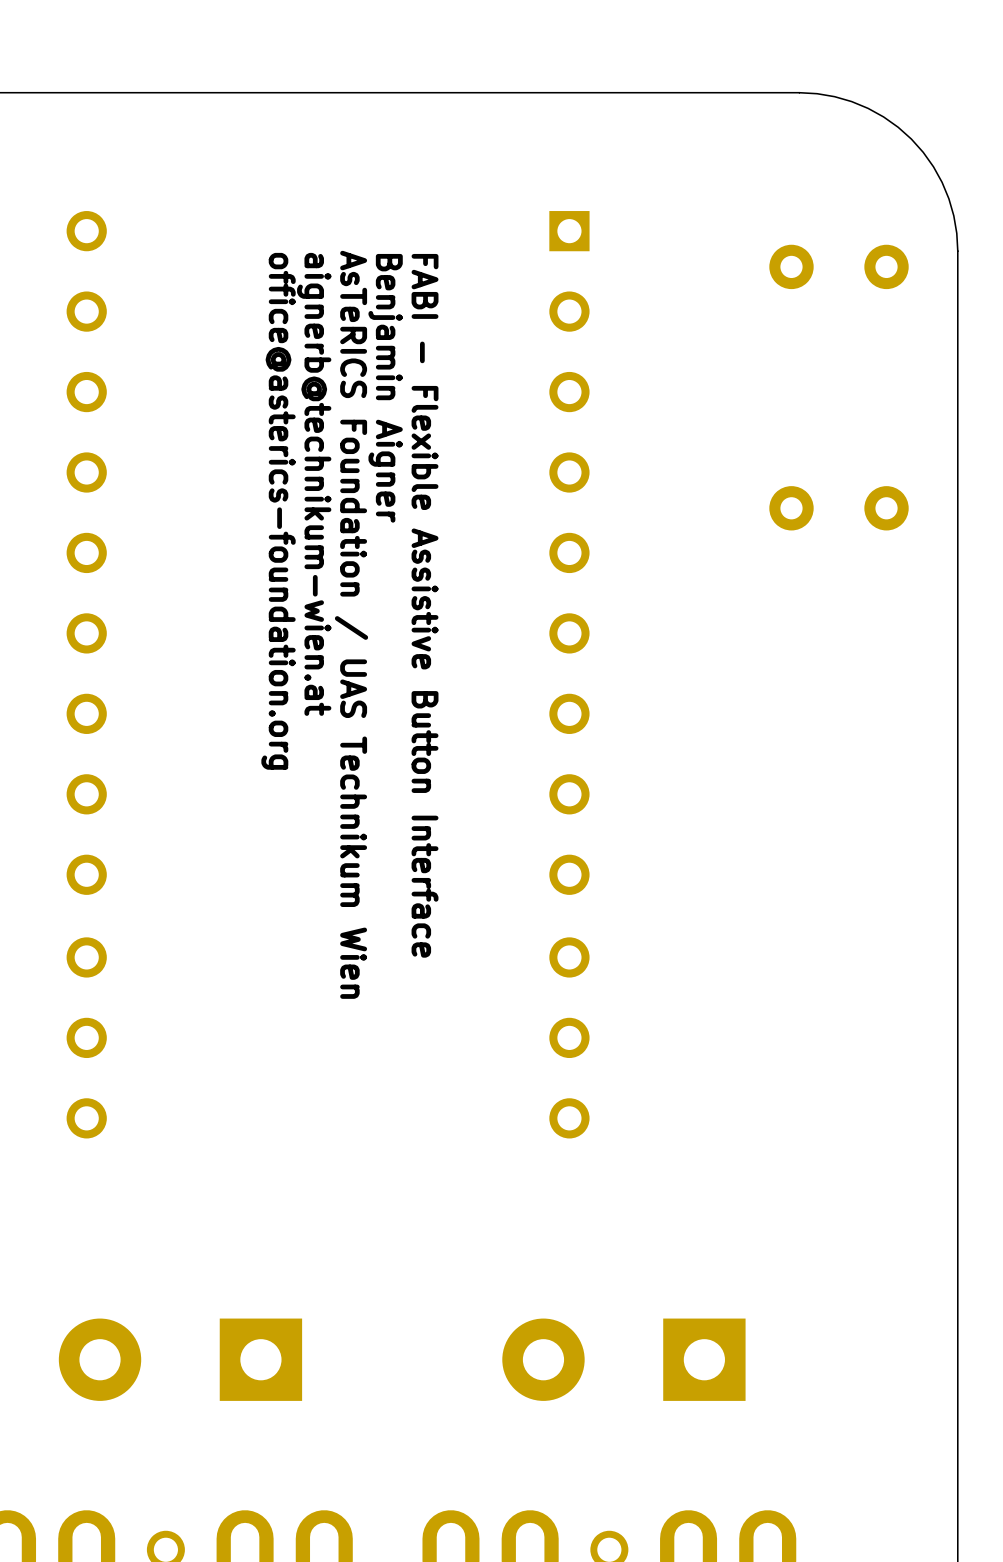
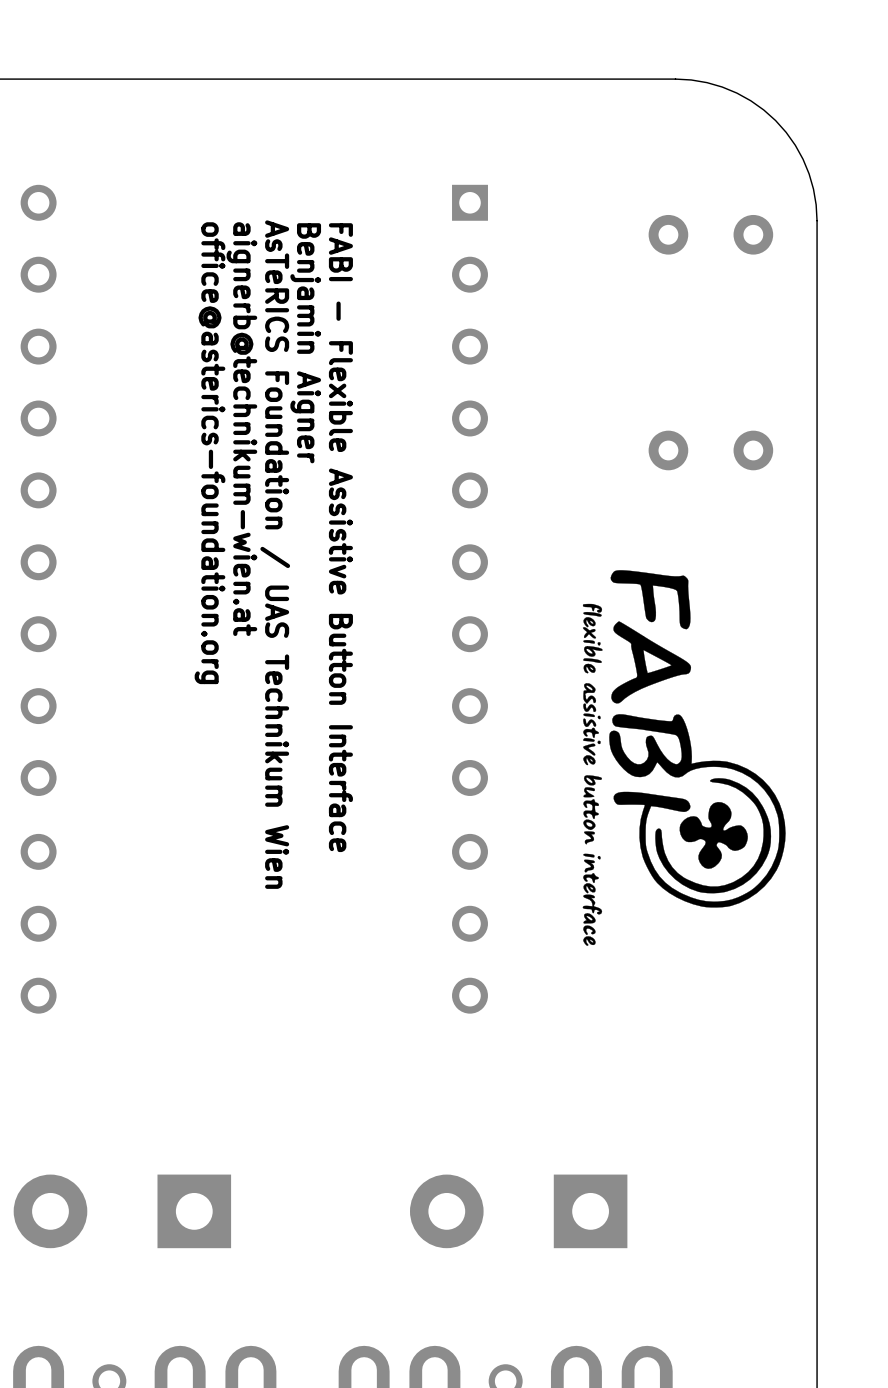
drawing: none -> [582, 570, 786, 946]

